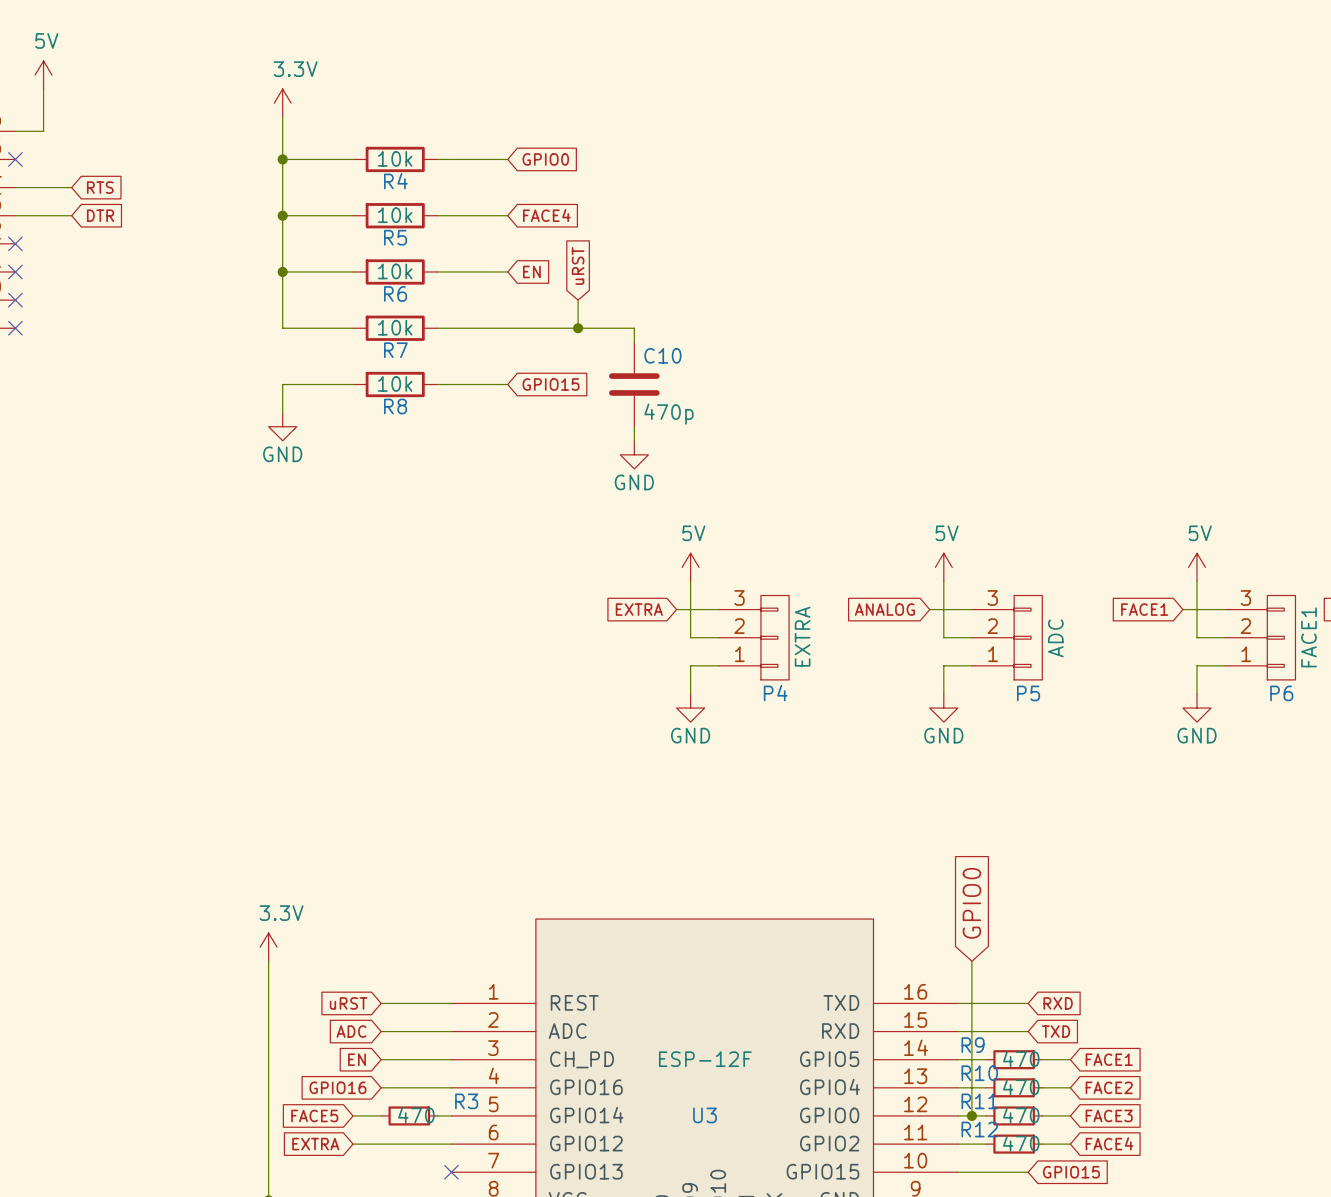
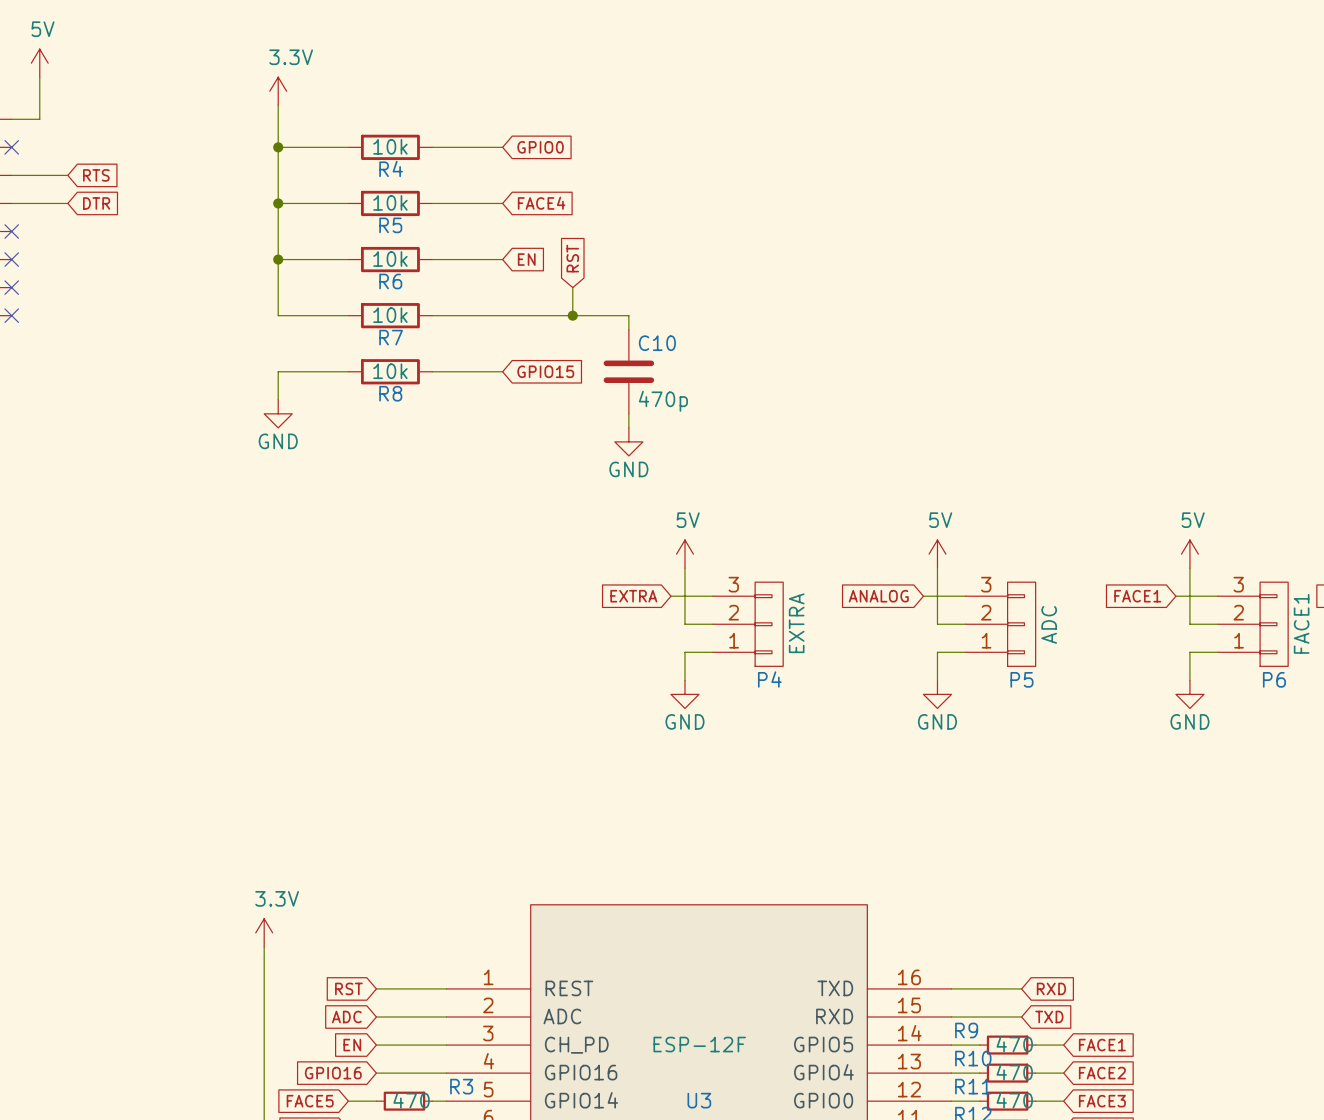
global label: uRST (578, 266) -> RST (572, 258)
global label: GPIO0 (971, 903) -> none
wire: (971, 961) (971, 1115) -> none
global label: uRST (348, 1003) -> RST (348, 988)
junction: (971, 1115) -> none

